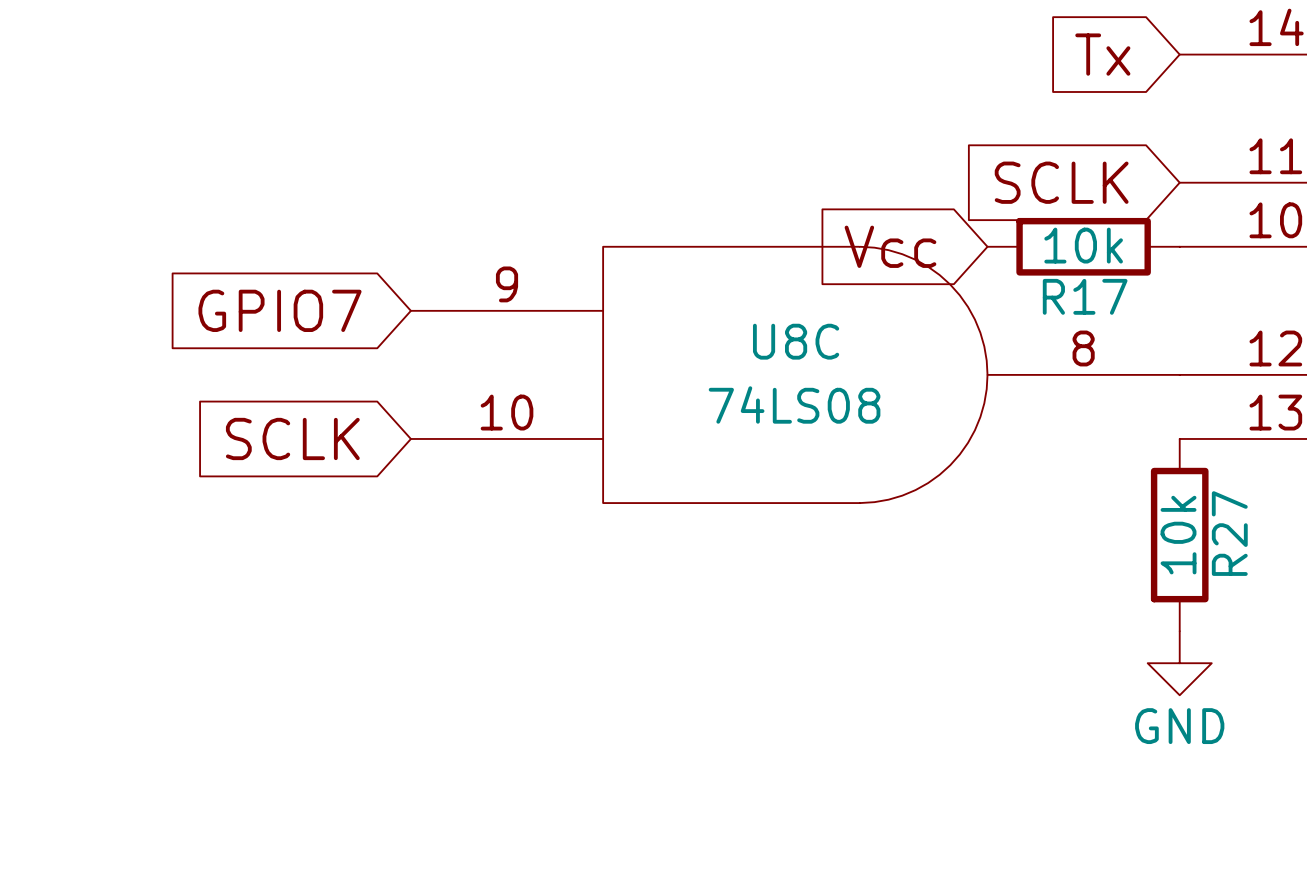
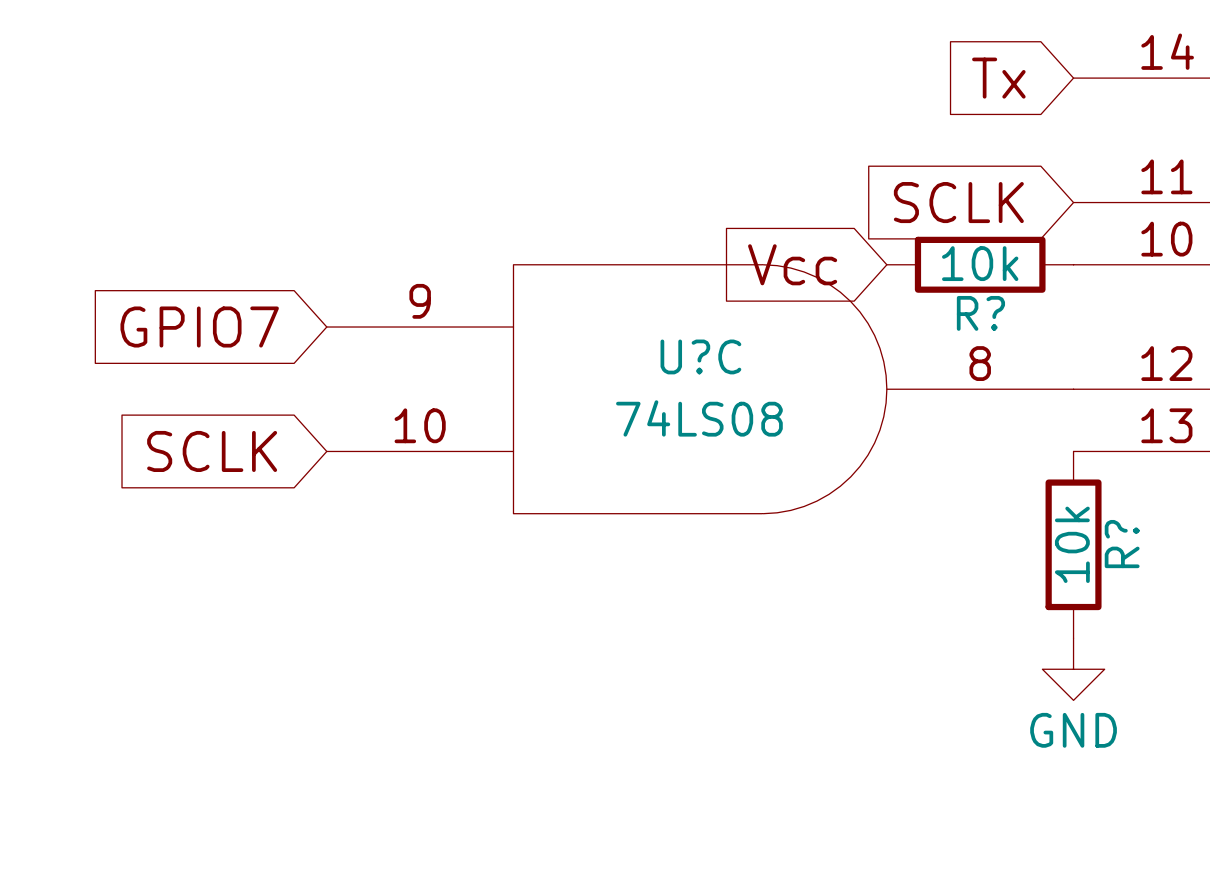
R17 name: R17 (1085, 296) -> R? (980, 313)
U8C name: U8C (796, 341) -> U?C (700, 356)
R27 name: R27 (1229, 533) -> R? (1122, 544)

